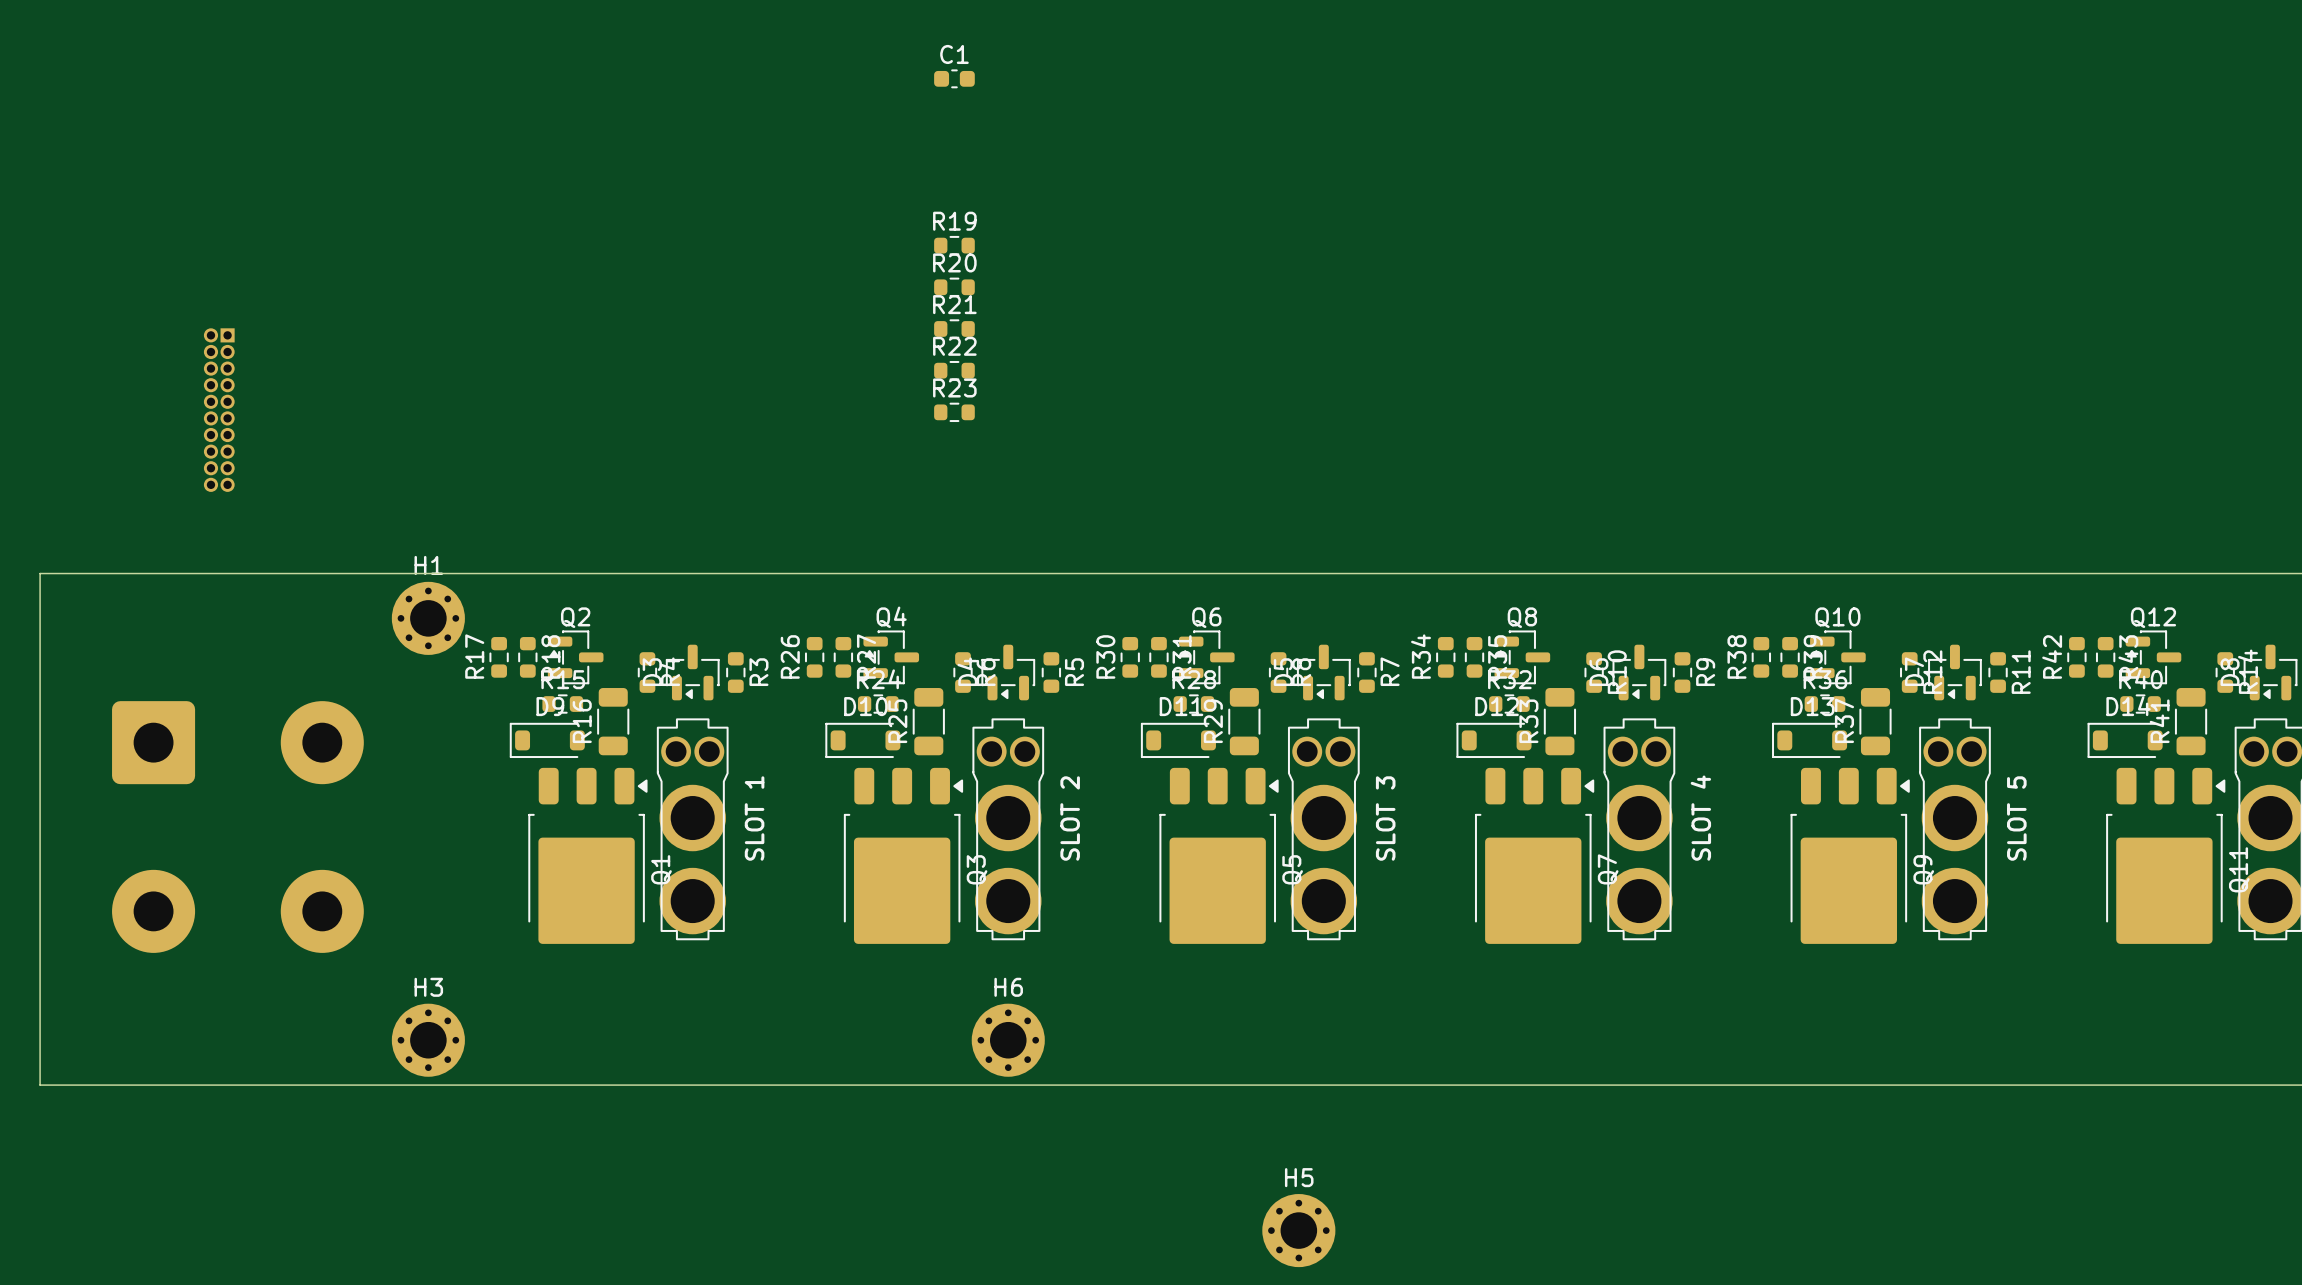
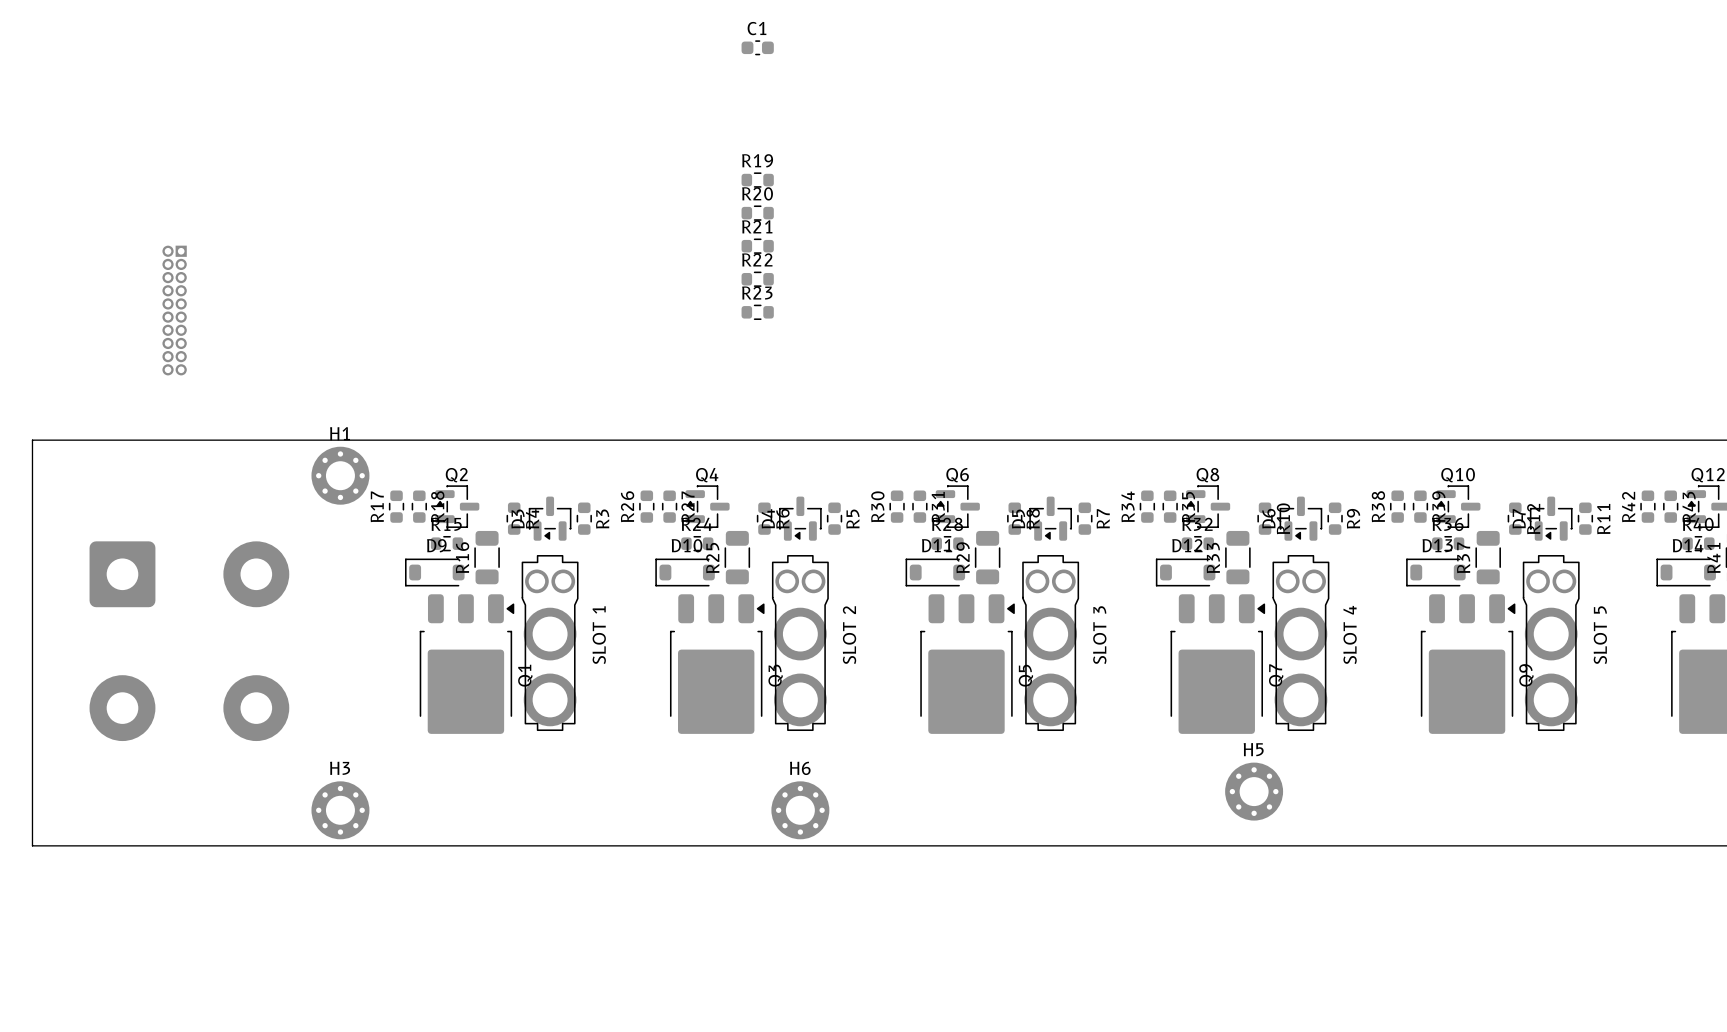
H5 position: (1298, 1230) -> (1254, 791)

